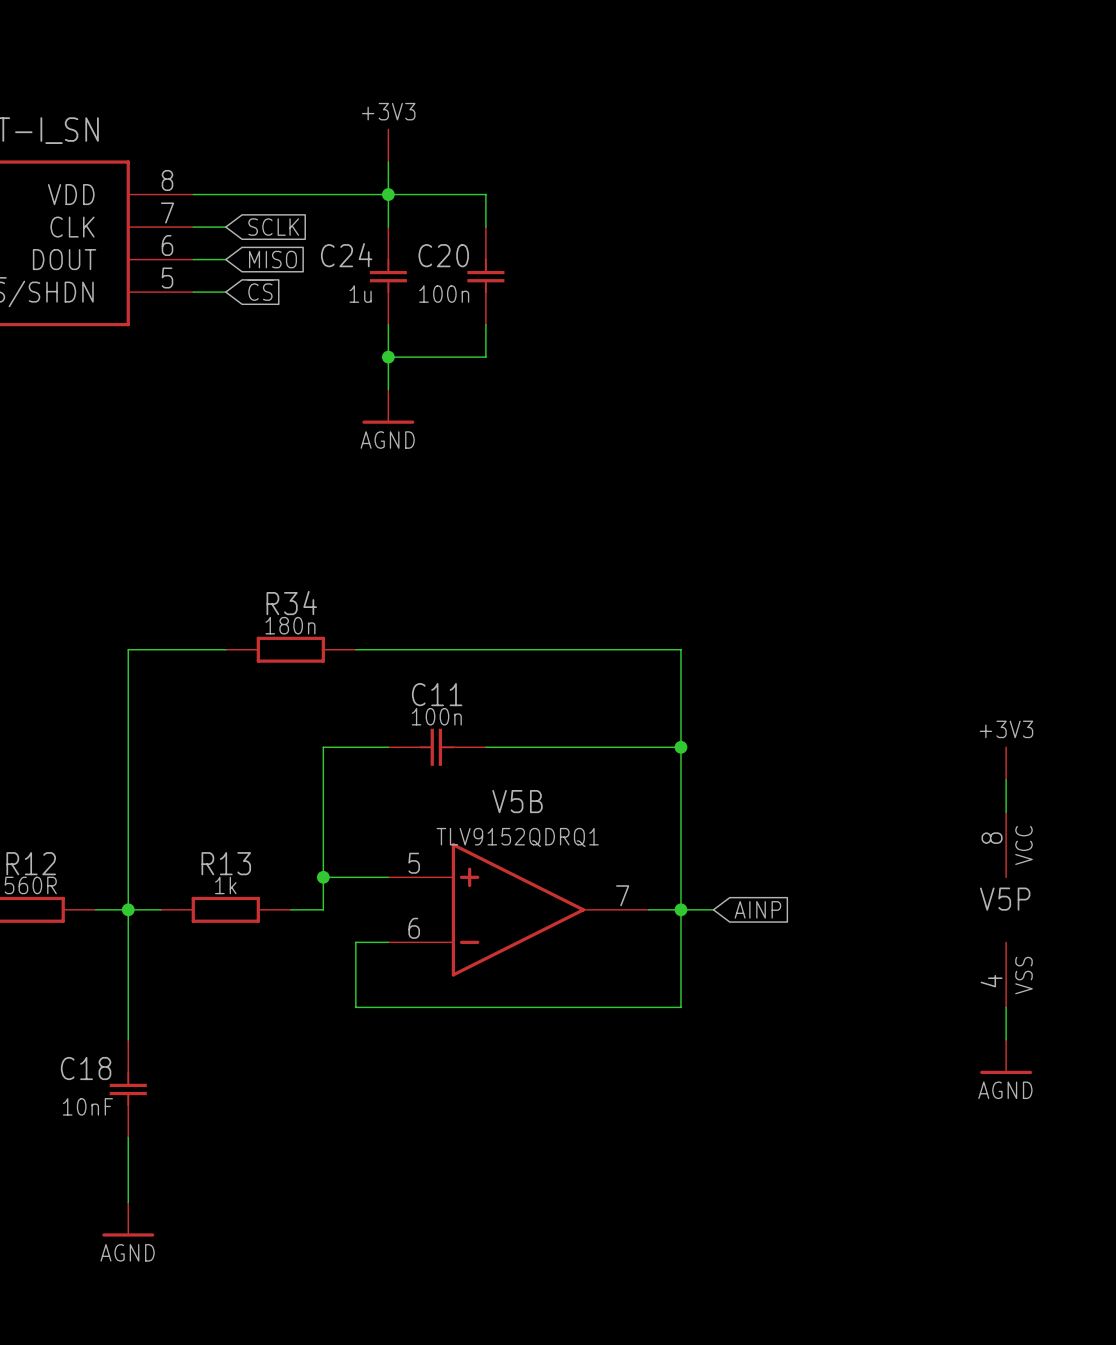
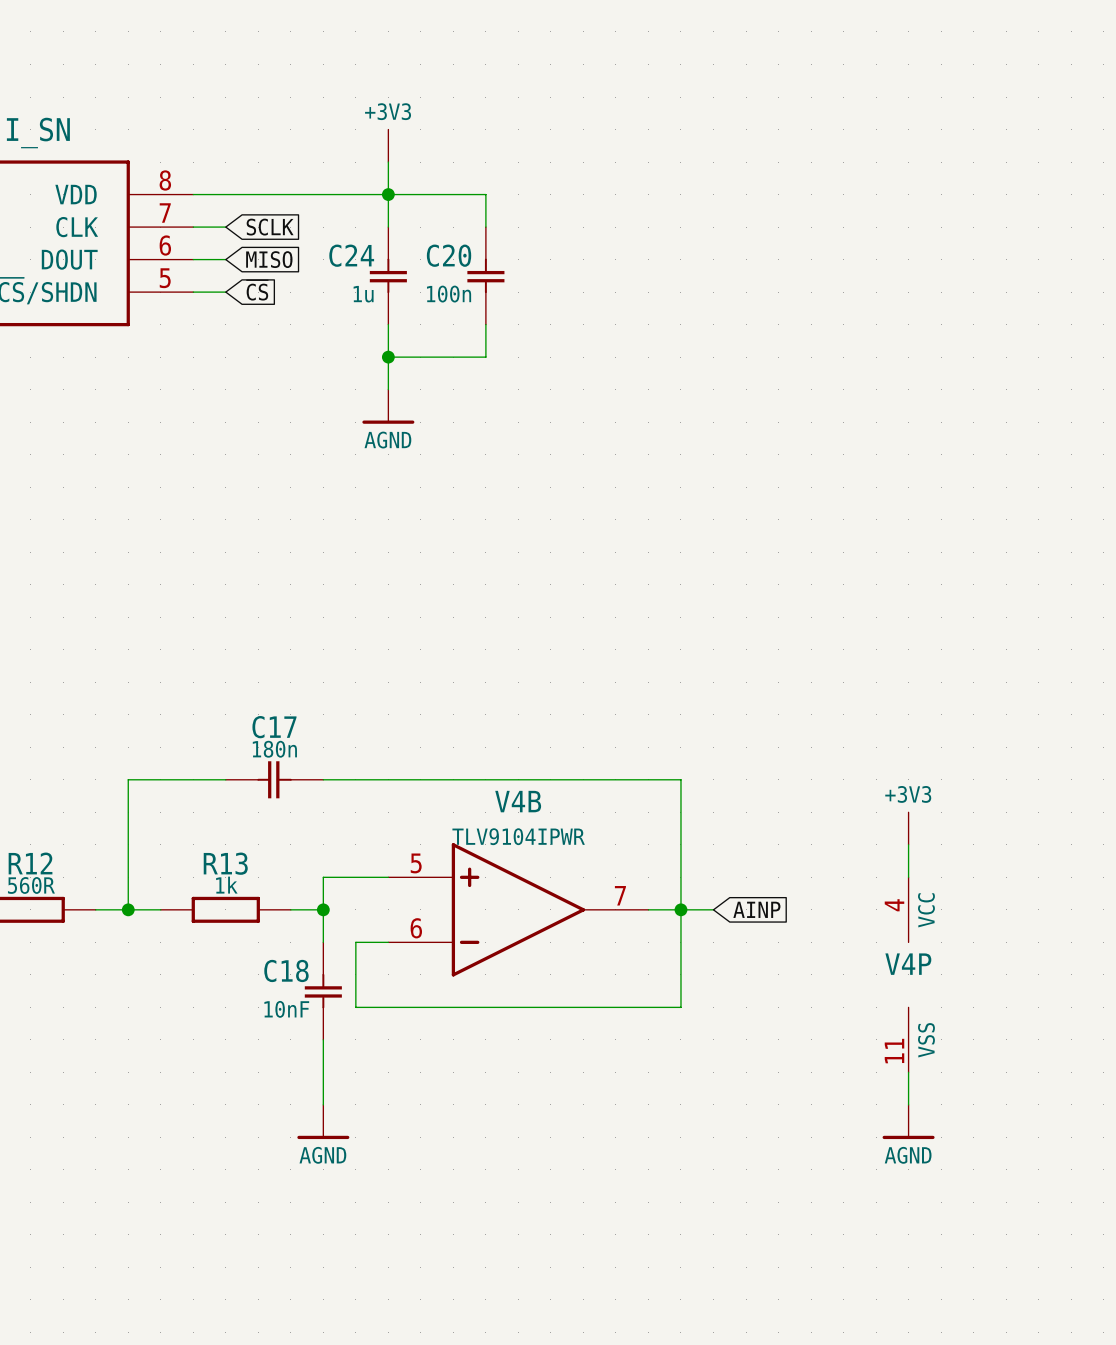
wire: (225, 649) (128, 649) (128, 779) -> (225, 779) (128, 779)
R34: 180n (290, 649) -> none
wire: (355, 649) (680, 649) (680, 779) -> (323, 779) (680, 779)
wire: (388, 747) (323, 747) (323, 877) -> none
C11: 100n (437, 747) -> none
wire: (485, 747) (680, 747) -> none
junction: (680, 747) -> none
power symbol position: +3V3 (1006, 763) -> +3V3 (908, 828)
C17: none -> 180n (274, 779)
wire: (1006, 779) (1006, 812) -> (908, 844) (908, 877)
V5B name: V5B (517, 801) -> V4B (518, 801)
V5B value: TLV9152QDRQ1 (517, 837) -> TLV9104IPWR (518, 836)
junction position: (323, 877) -> (323, 909)
wire: (128, 909) (128, 1039) -> none
wire: none -> (323, 909) (323, 942)
V5P: (1006, 909) -> none
V4P: none -> (908, 974)
wire: (1006, 1007) (1006, 1039) -> (908, 1072) (908, 1104)
power symbol position: AGND (1006, 1056) -> AGND (908, 1121)
C18 position: (128, 1088) -> (323, 991)
wire: (128, 1137) (128, 1202) -> (323, 1039) (323, 1104)
power symbol position: AGND (128, 1219) -> AGND (323, 1121)

